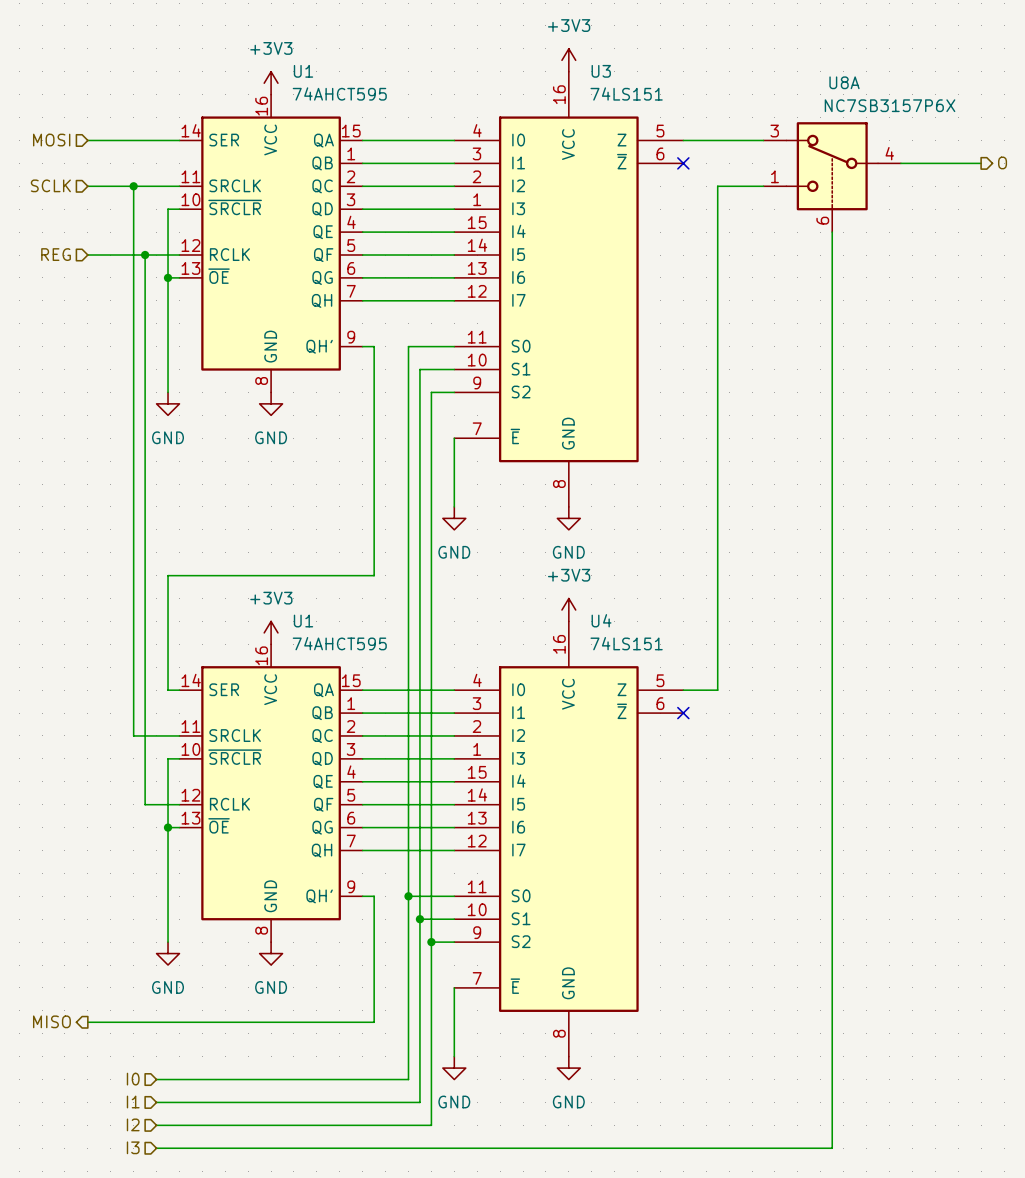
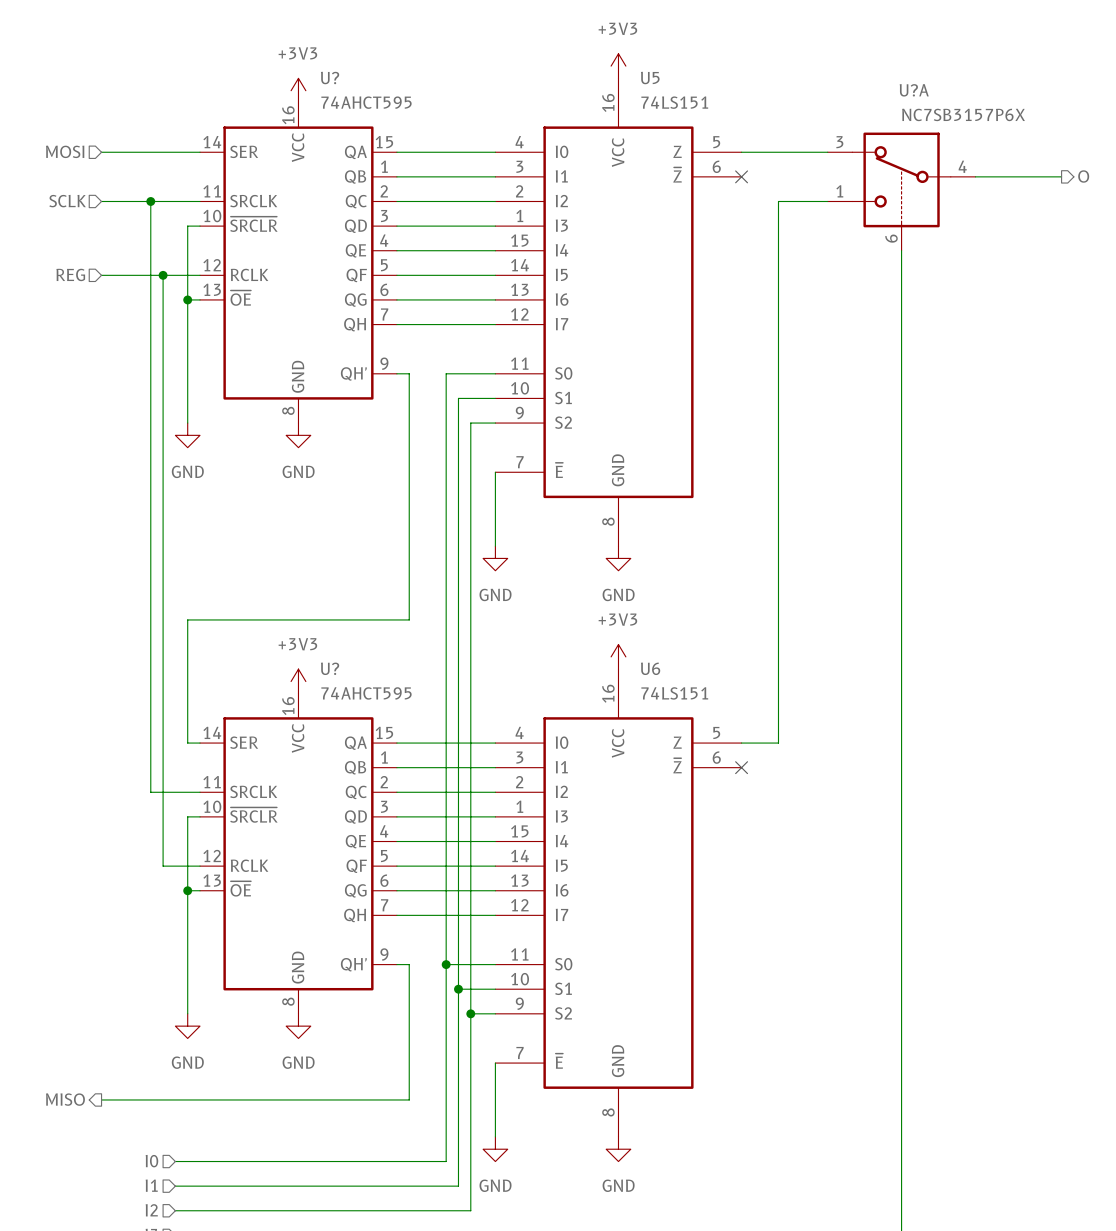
U1 name: U1 (303, 71) -> U? (330, 78)
U3 name: U3 (601, 71) -> U5 (650, 78)
U8A name: U8A (844, 82) -> U?A (914, 90)
U4 name: U4 (601, 620) -> U6 (650, 668)
U1 name: U1 (303, 621) -> U? (330, 668)

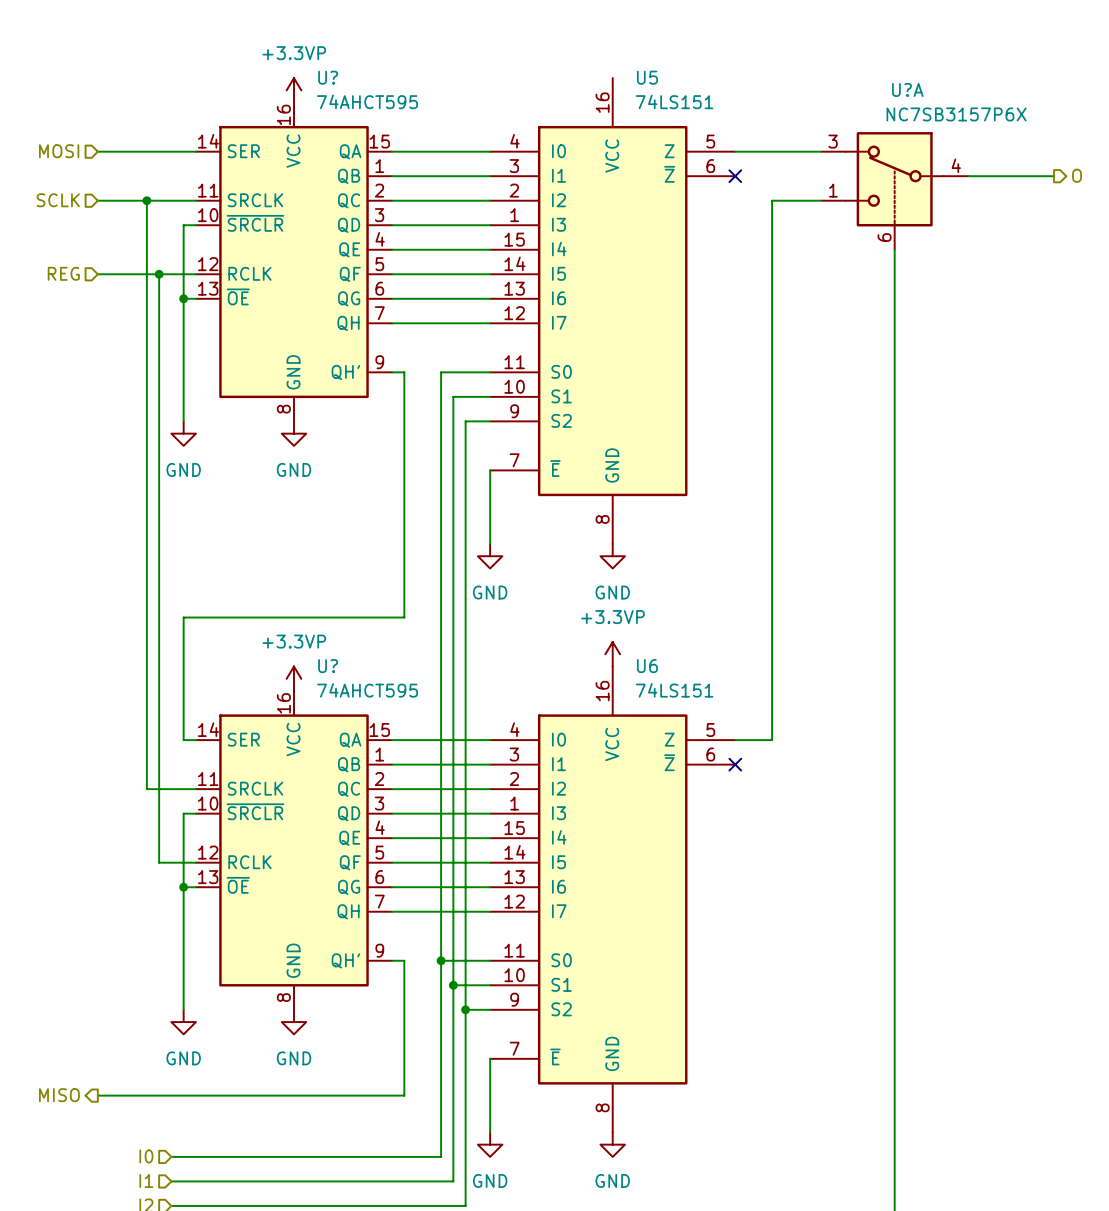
power symbol: +3V3 (618, 66) -> none
power symbol: +3V3 (298, 90) -> +3.3VP (293, 90)
power symbol: +3V3 (618, 656) -> +3.3VP (612, 654)
power symbol: +3V3 (298, 681) -> +3.3VP (293, 678)

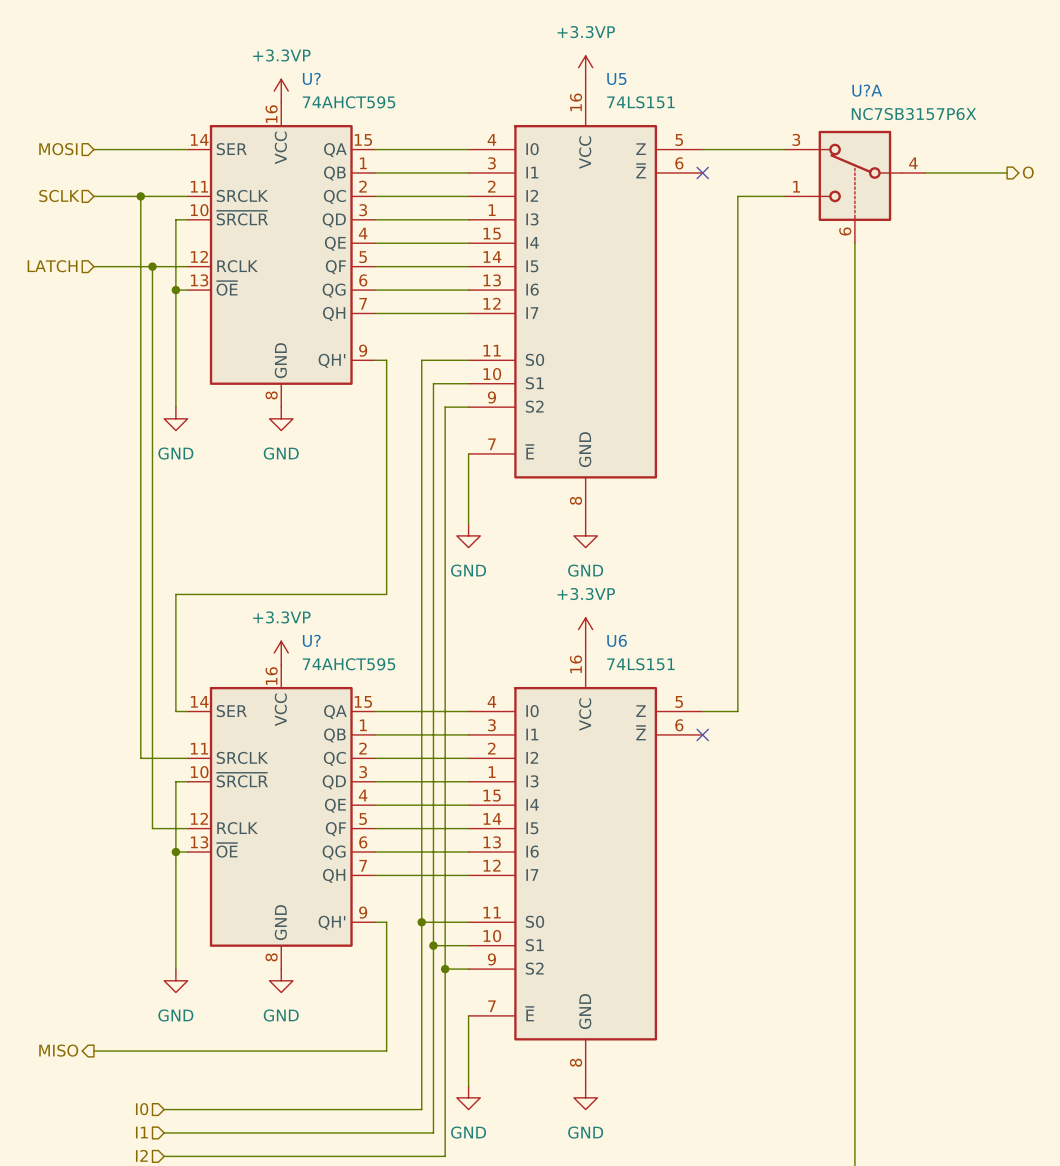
power symbol: none -> +3.3VP (585, 67)
hierarchical label: REG (63, 273) -> LATCH (52, 266)

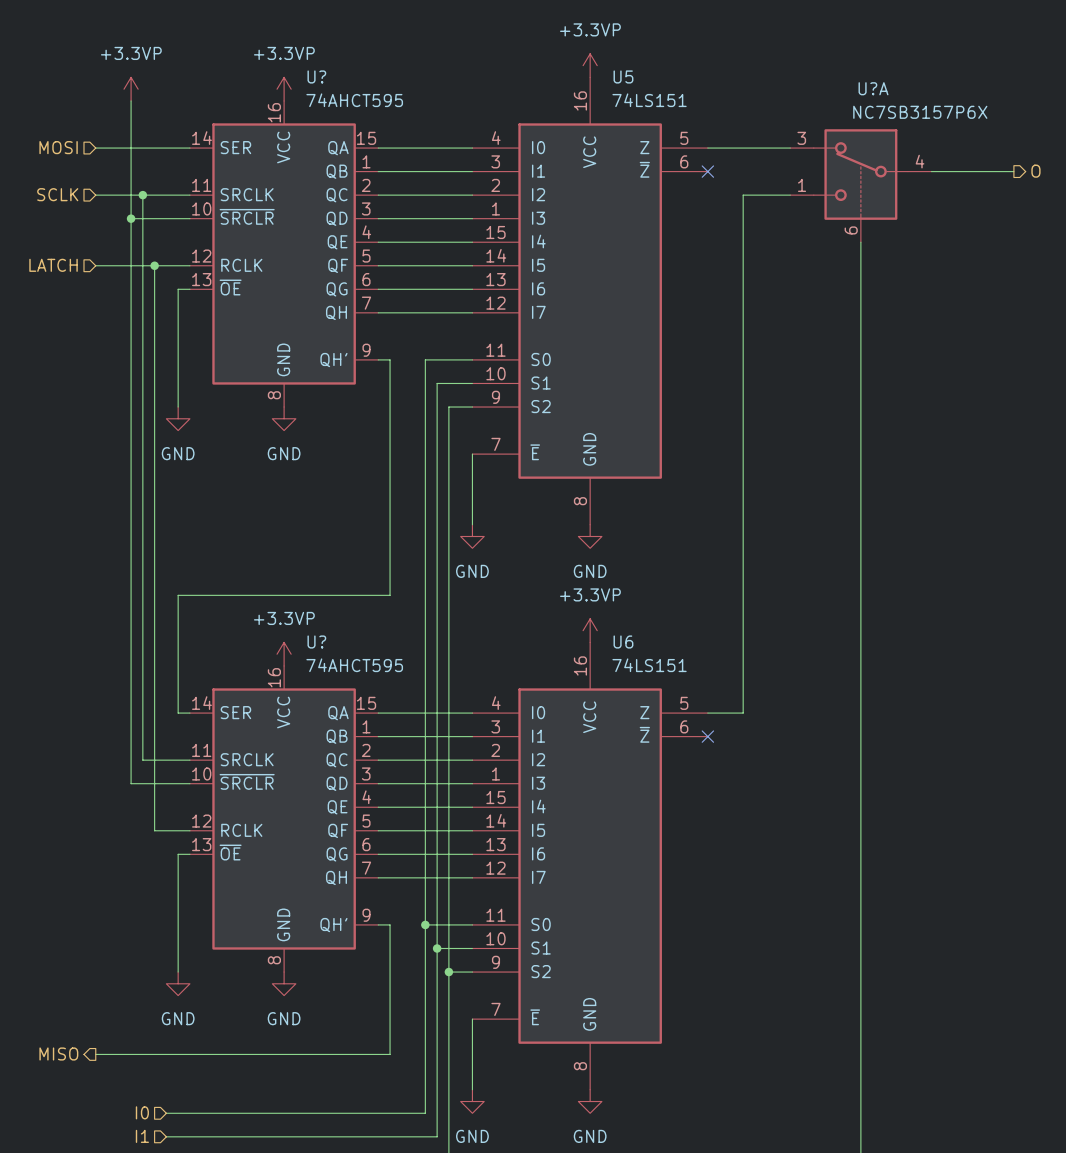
power symbol: none -> +3.3VP (131, 89)
junction: none -> (131, 218)
wire: (175, 219) (175, 290) -> (178, 218) (131, 218)
junction: (175, 290) -> none
wire: (175, 781) (175, 852) -> (178, 783) (131, 783) (131, 100)
junction: (175, 852) -> none

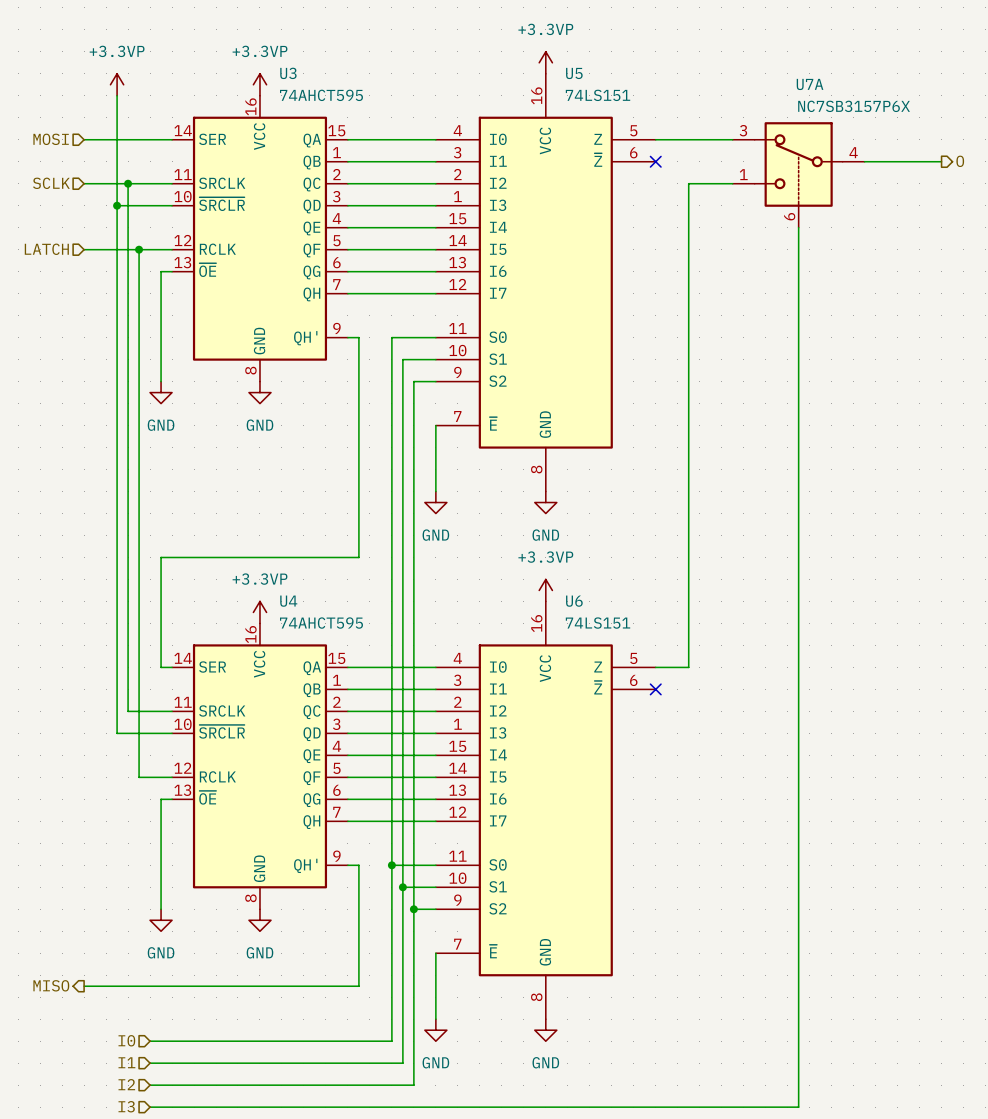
U? name: U? (316, 76) -> U3 (288, 73)
U?A name: U?A (873, 88) -> U7A (810, 84)
U? name: U? (316, 642) -> U4 (288, 601)

